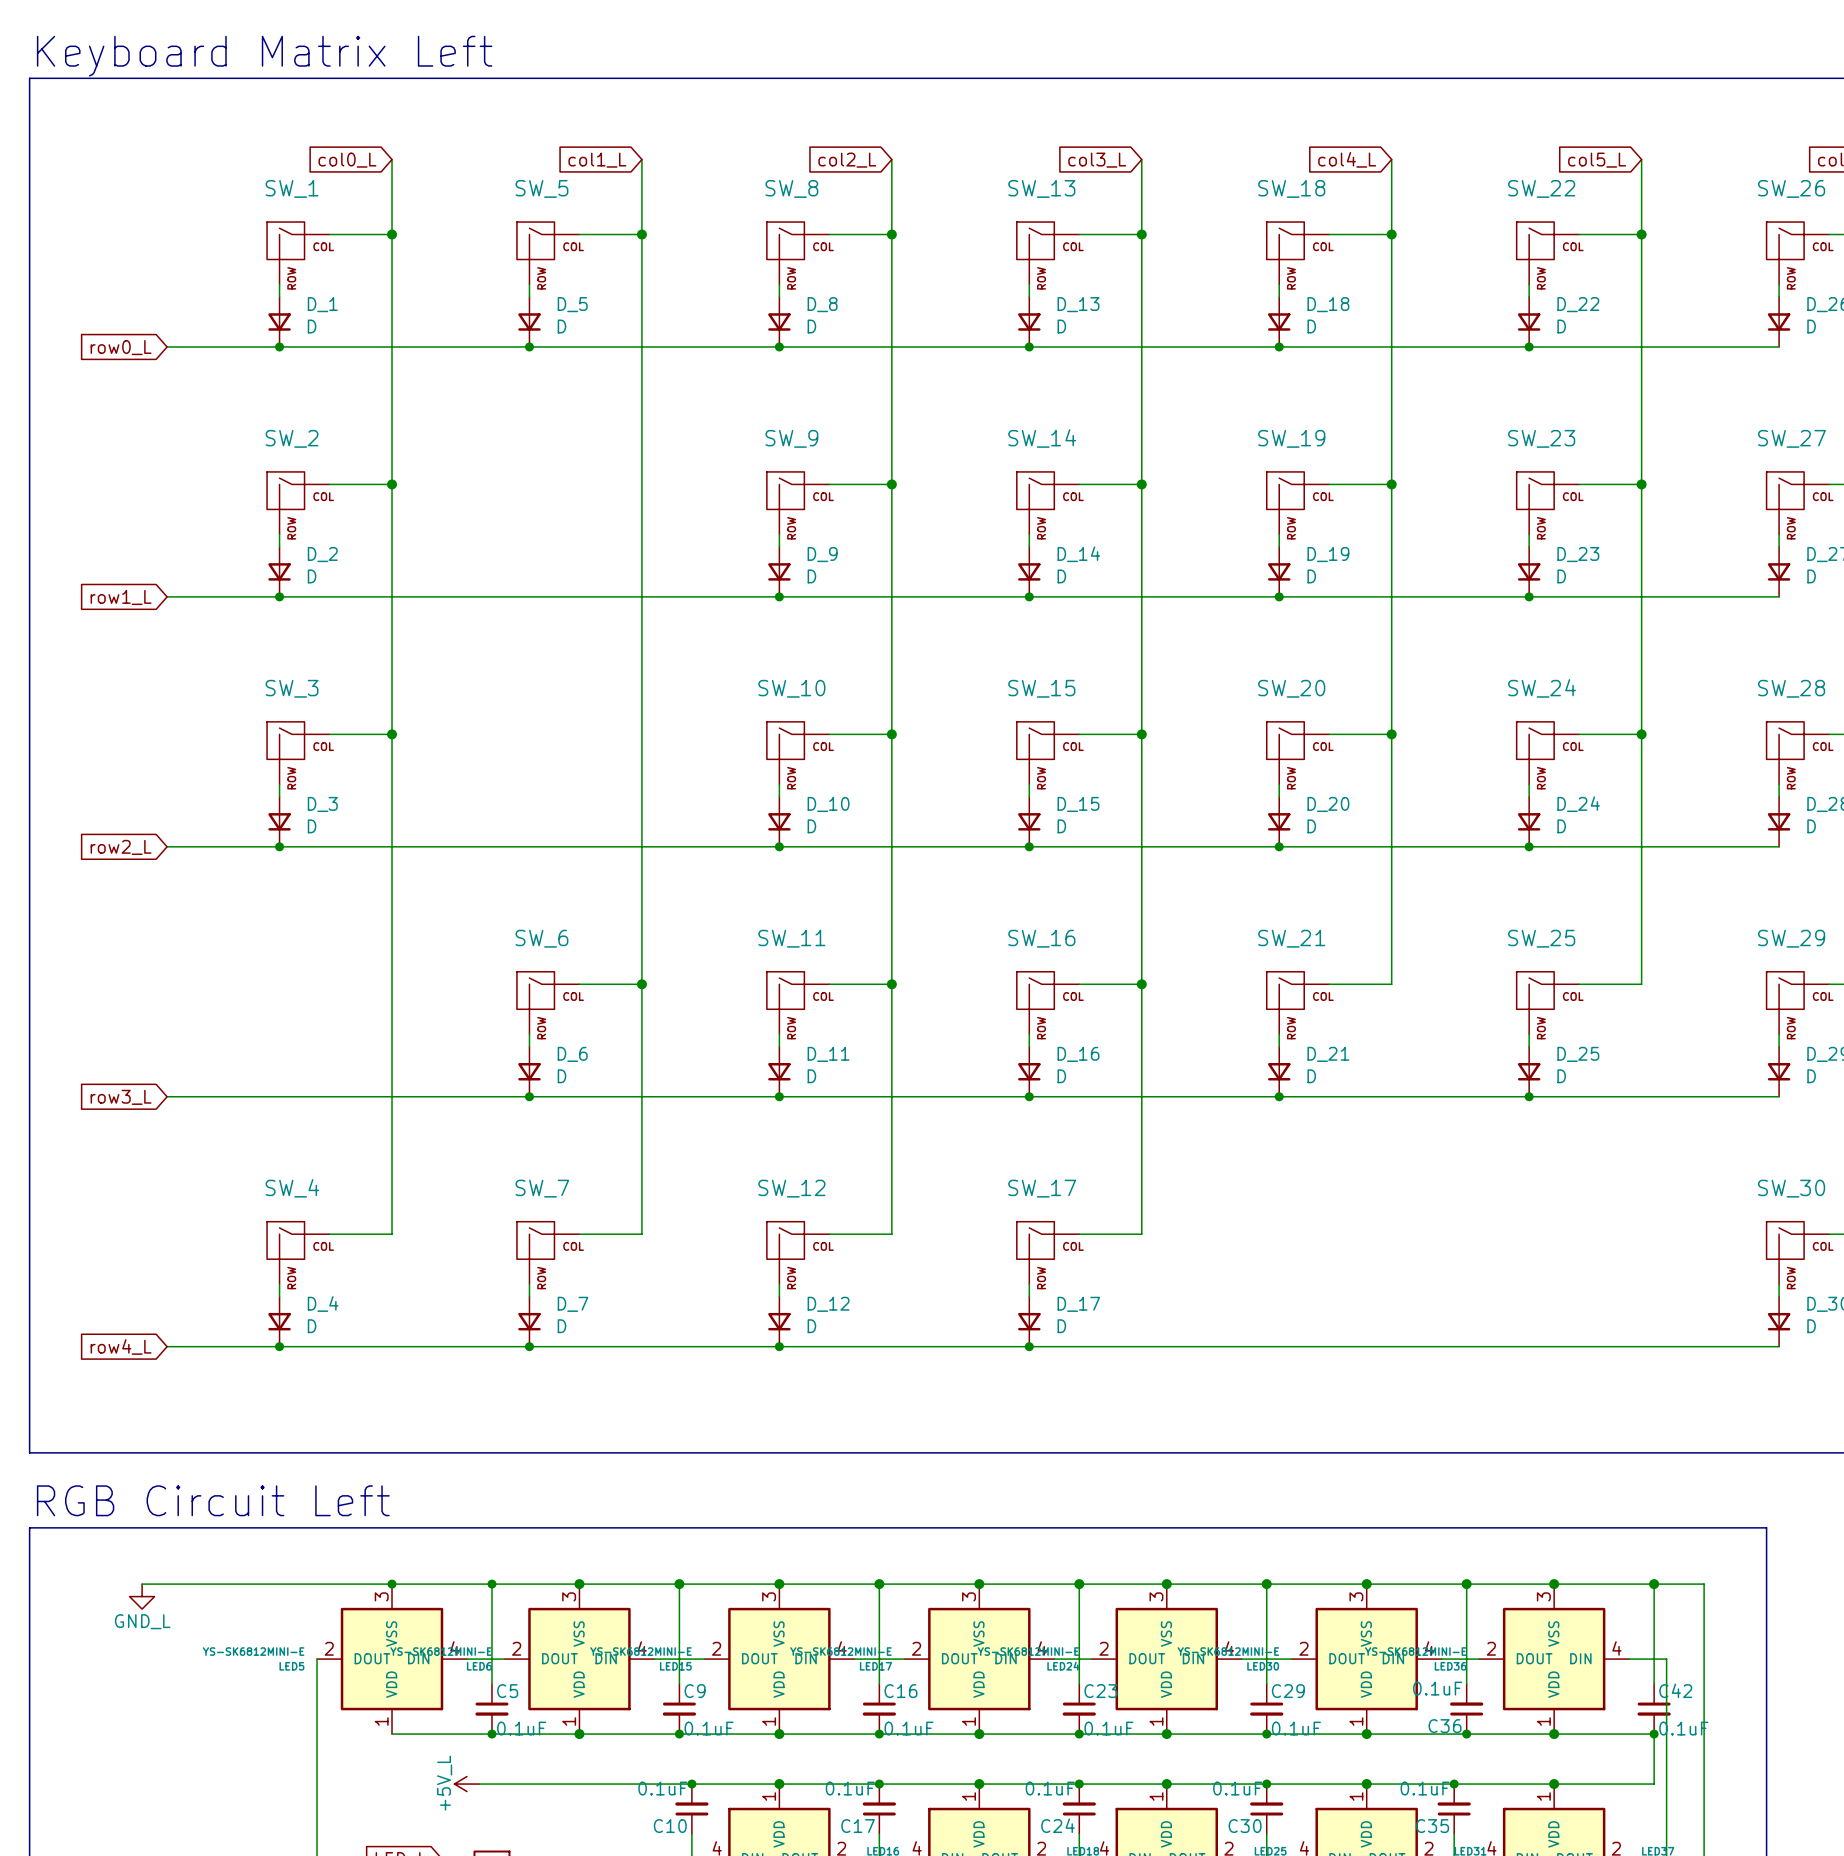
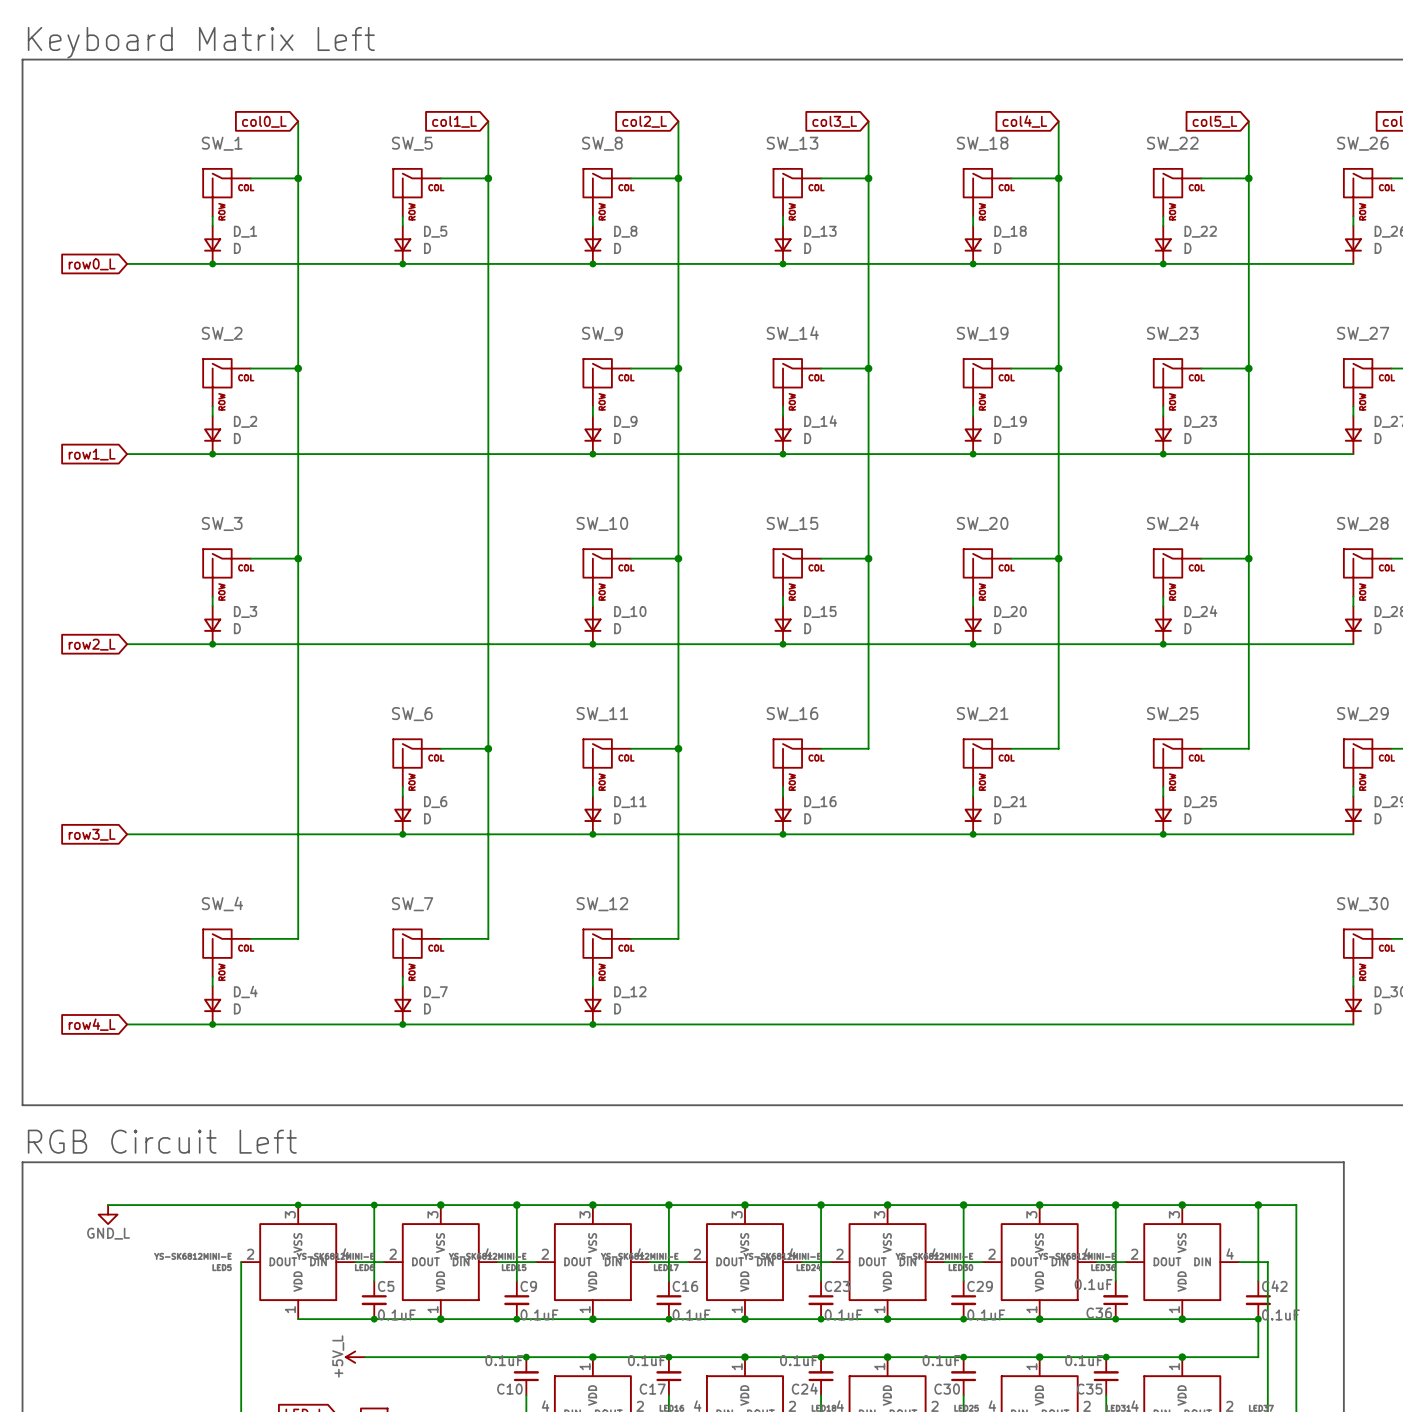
wire: (1141, 984) (1141, 1234) (1079, 1234) -> none
junction: (1141, 984) -> none
SW_17: (1048, 1252) -> none
wire: (1029, 1284) (1029, 1296) -> none
D_17: D (1029, 1321) -> none
junction: (1029, 1346) -> none

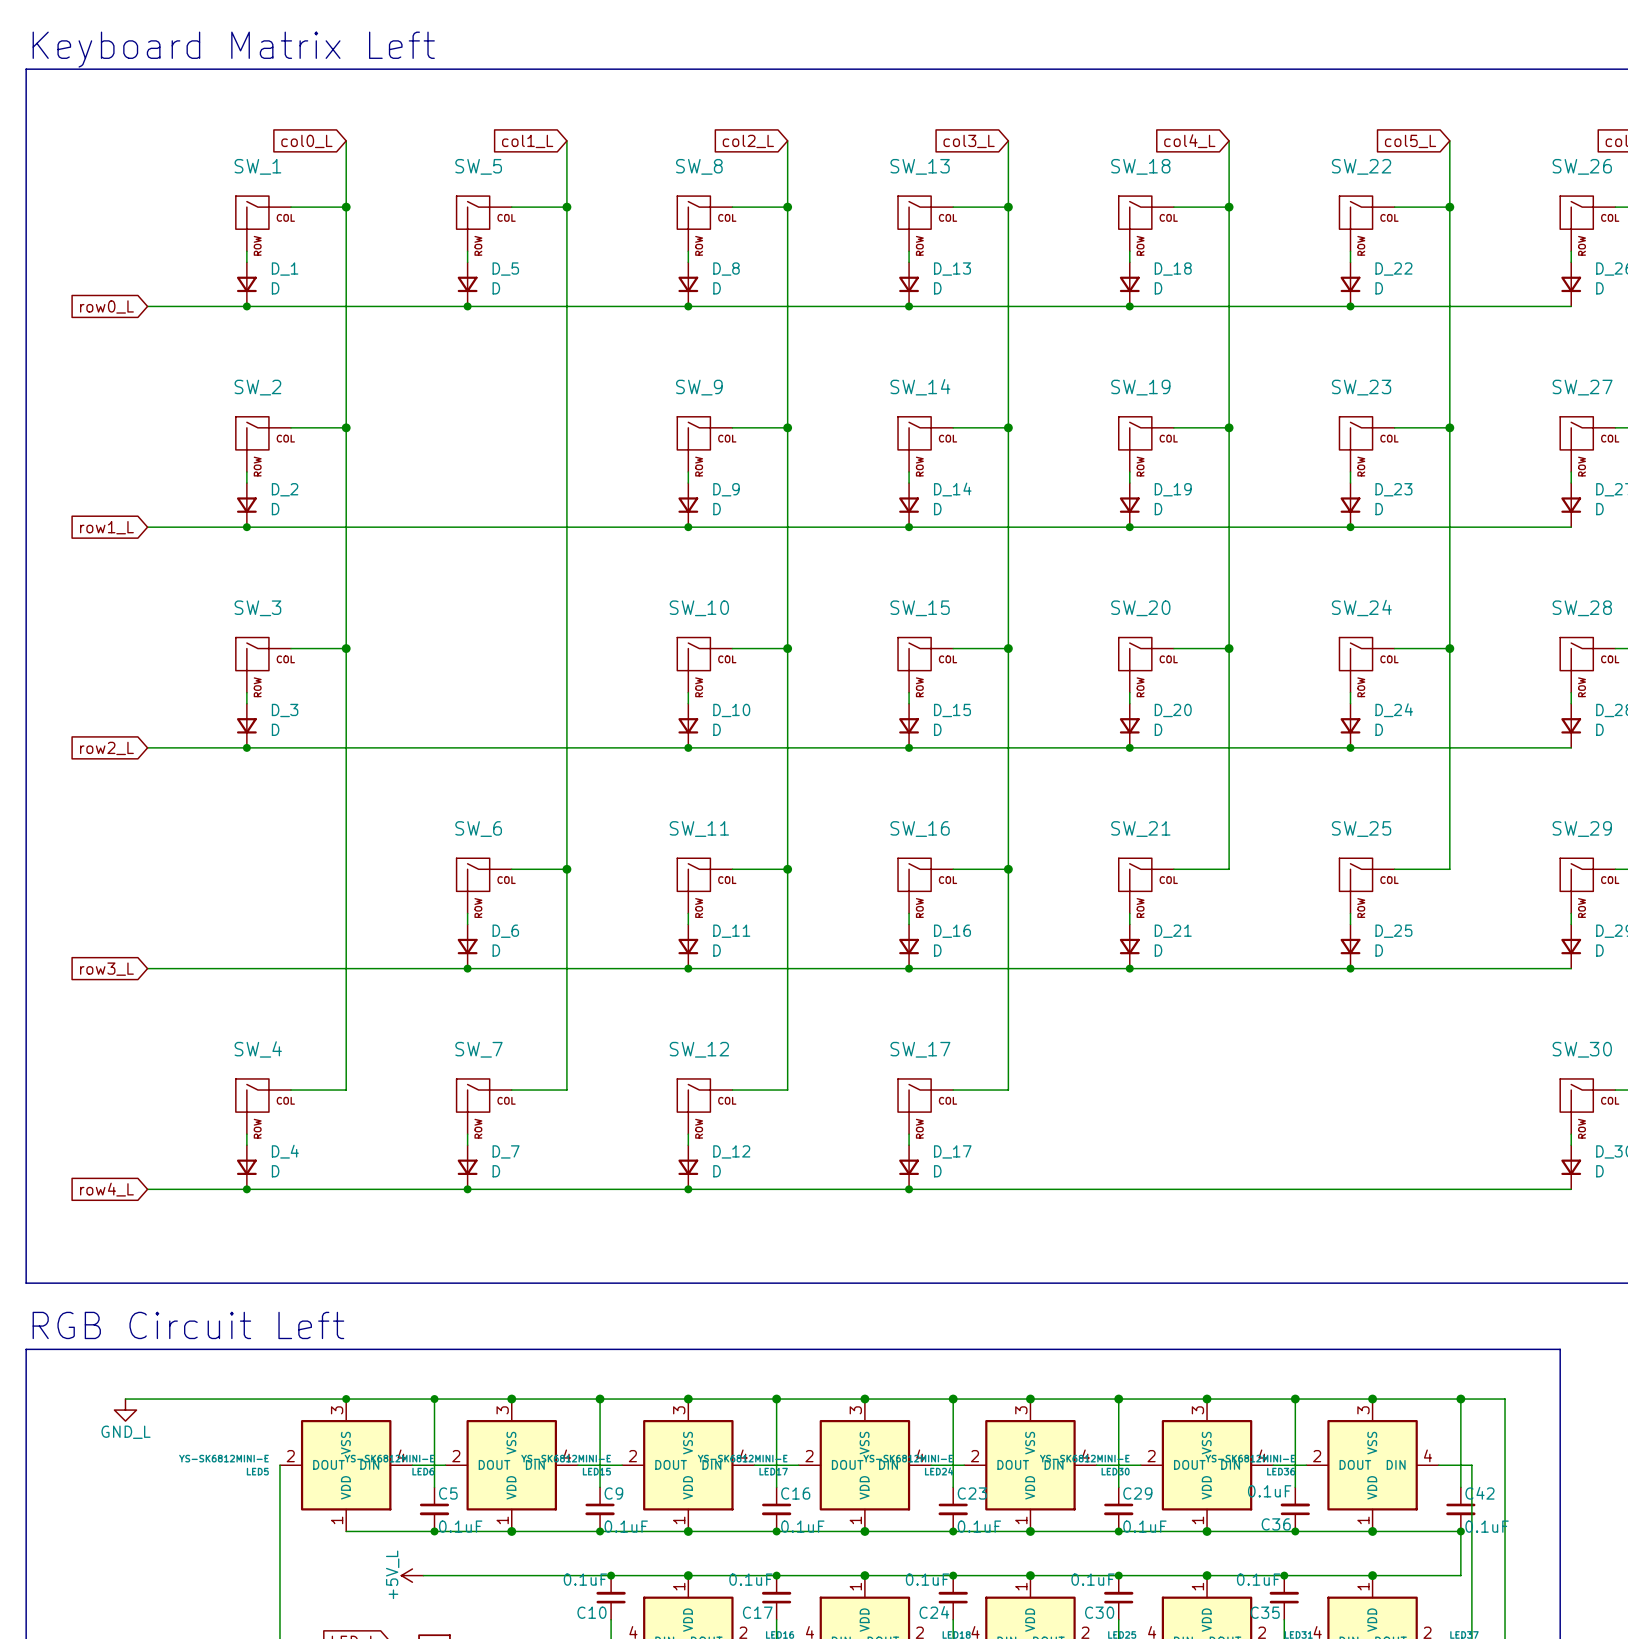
wire: none -> (1008, 869) (1008, 1090) (953, 1090)
junction: none -> (1008, 869)
SW_17: none -> (925, 1106)
wire: none -> (909, 1134) (909, 1145)
D_17: none -> D (909, 1167)
junction: none -> (909, 1189)

